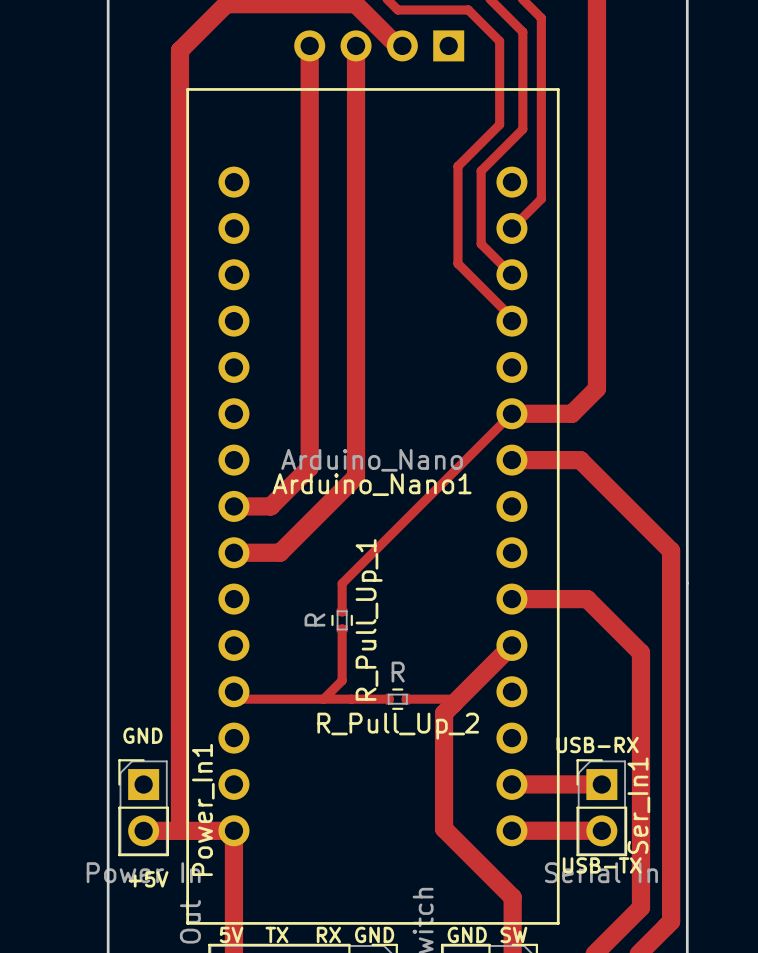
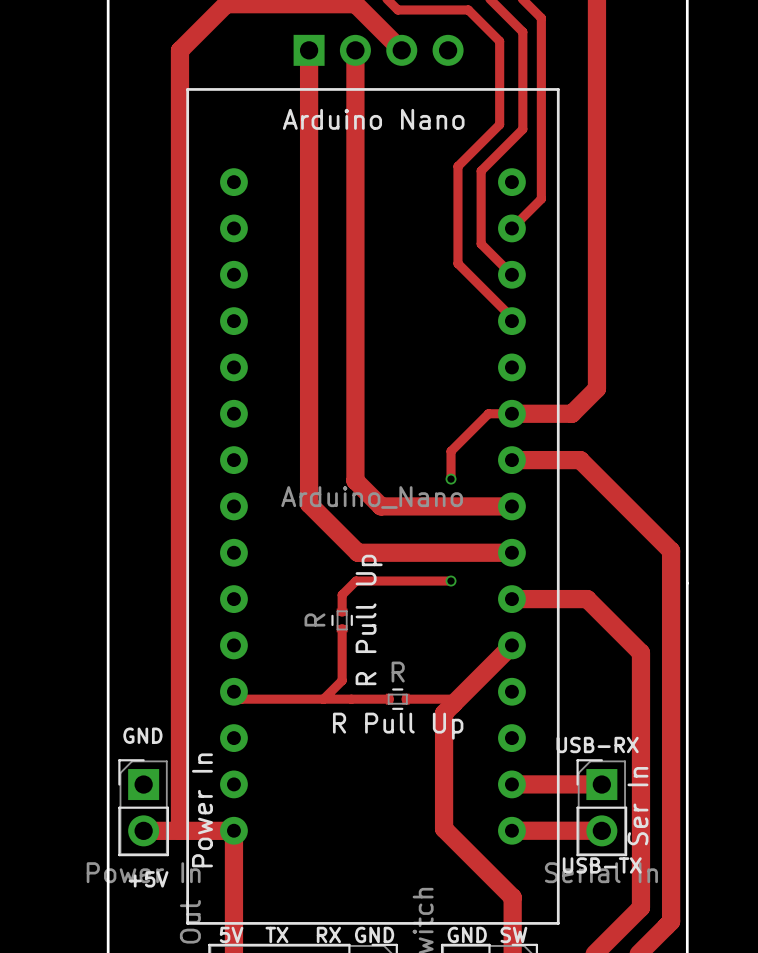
track: (309, 45) (309, 467) (270, 506) (233, 506) -> none
track: (356, 45) (356, 476) (280, 552) (233, 552) -> none
part rotation: 0° (379, 45) -> 180° (378, 50)
track: none -> (309, 50) (309, 503) (357, 552) (511, 552)
track: none -> (355, 50) (355, 480) (381, 506) (511, 506)
track: (511, 413) (342, 583) (342, 594) -> (511, 413) (488, 413) (451, 451) (451, 479)
via: none -> (451, 479)
Arduino_Nano1: Arduino_Nano (372, 506) -> none
Arduino Nano: none -> Arduino_Nano (372, 506)
track: none -> (451, 581) (356, 581) (342, 594)
via: none -> (451, 581)
R_Pull_Up_1 name: R_Pull_Up_1 (369, 619) -> R Pull Up (369, 619)
R_Pull_Up_2 name: R_Pull_Up_2 (398, 726) -> R Pull Up (398, 726)
Ser_In1 name: Ser_In1 (638, 805) -> Ser In (637, 806)
Power_In1 name: Power_In1 (203, 809) -> Power In (202, 810)

